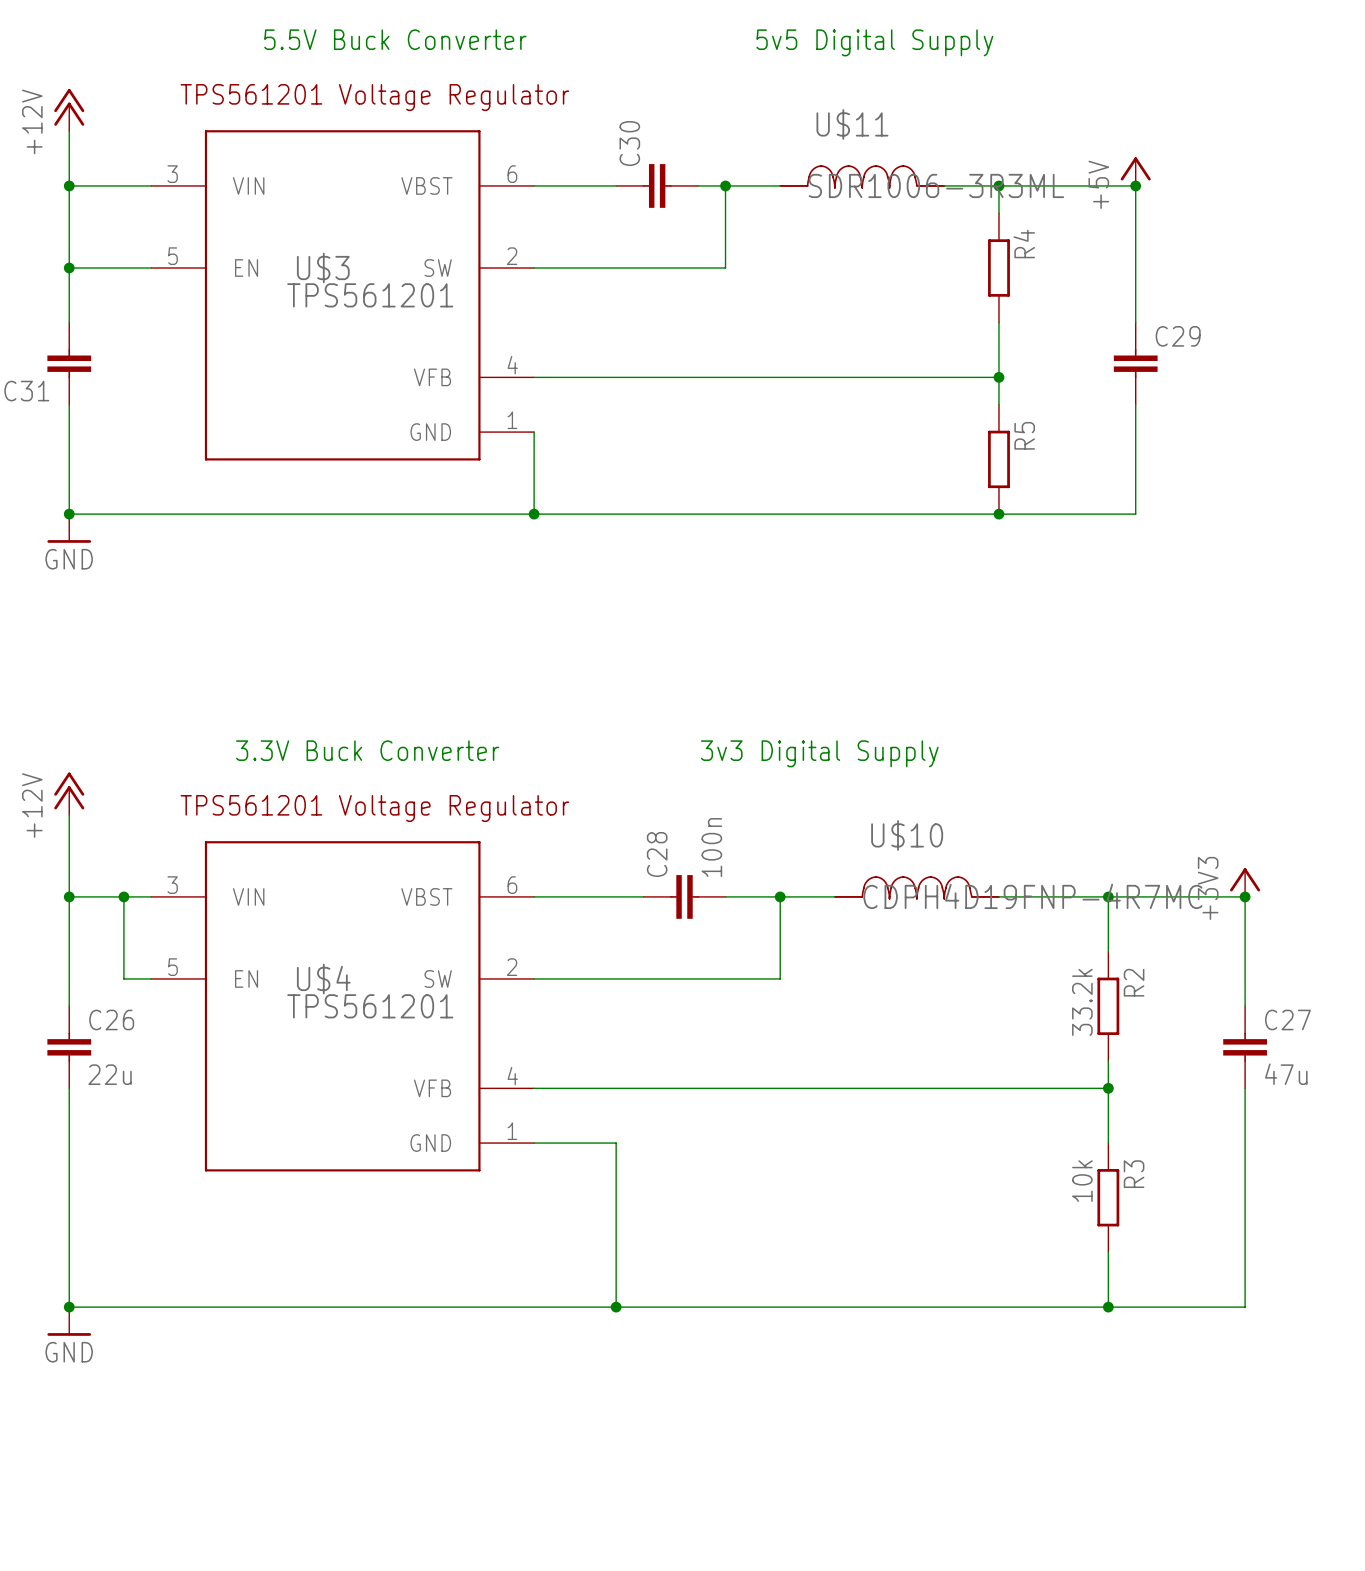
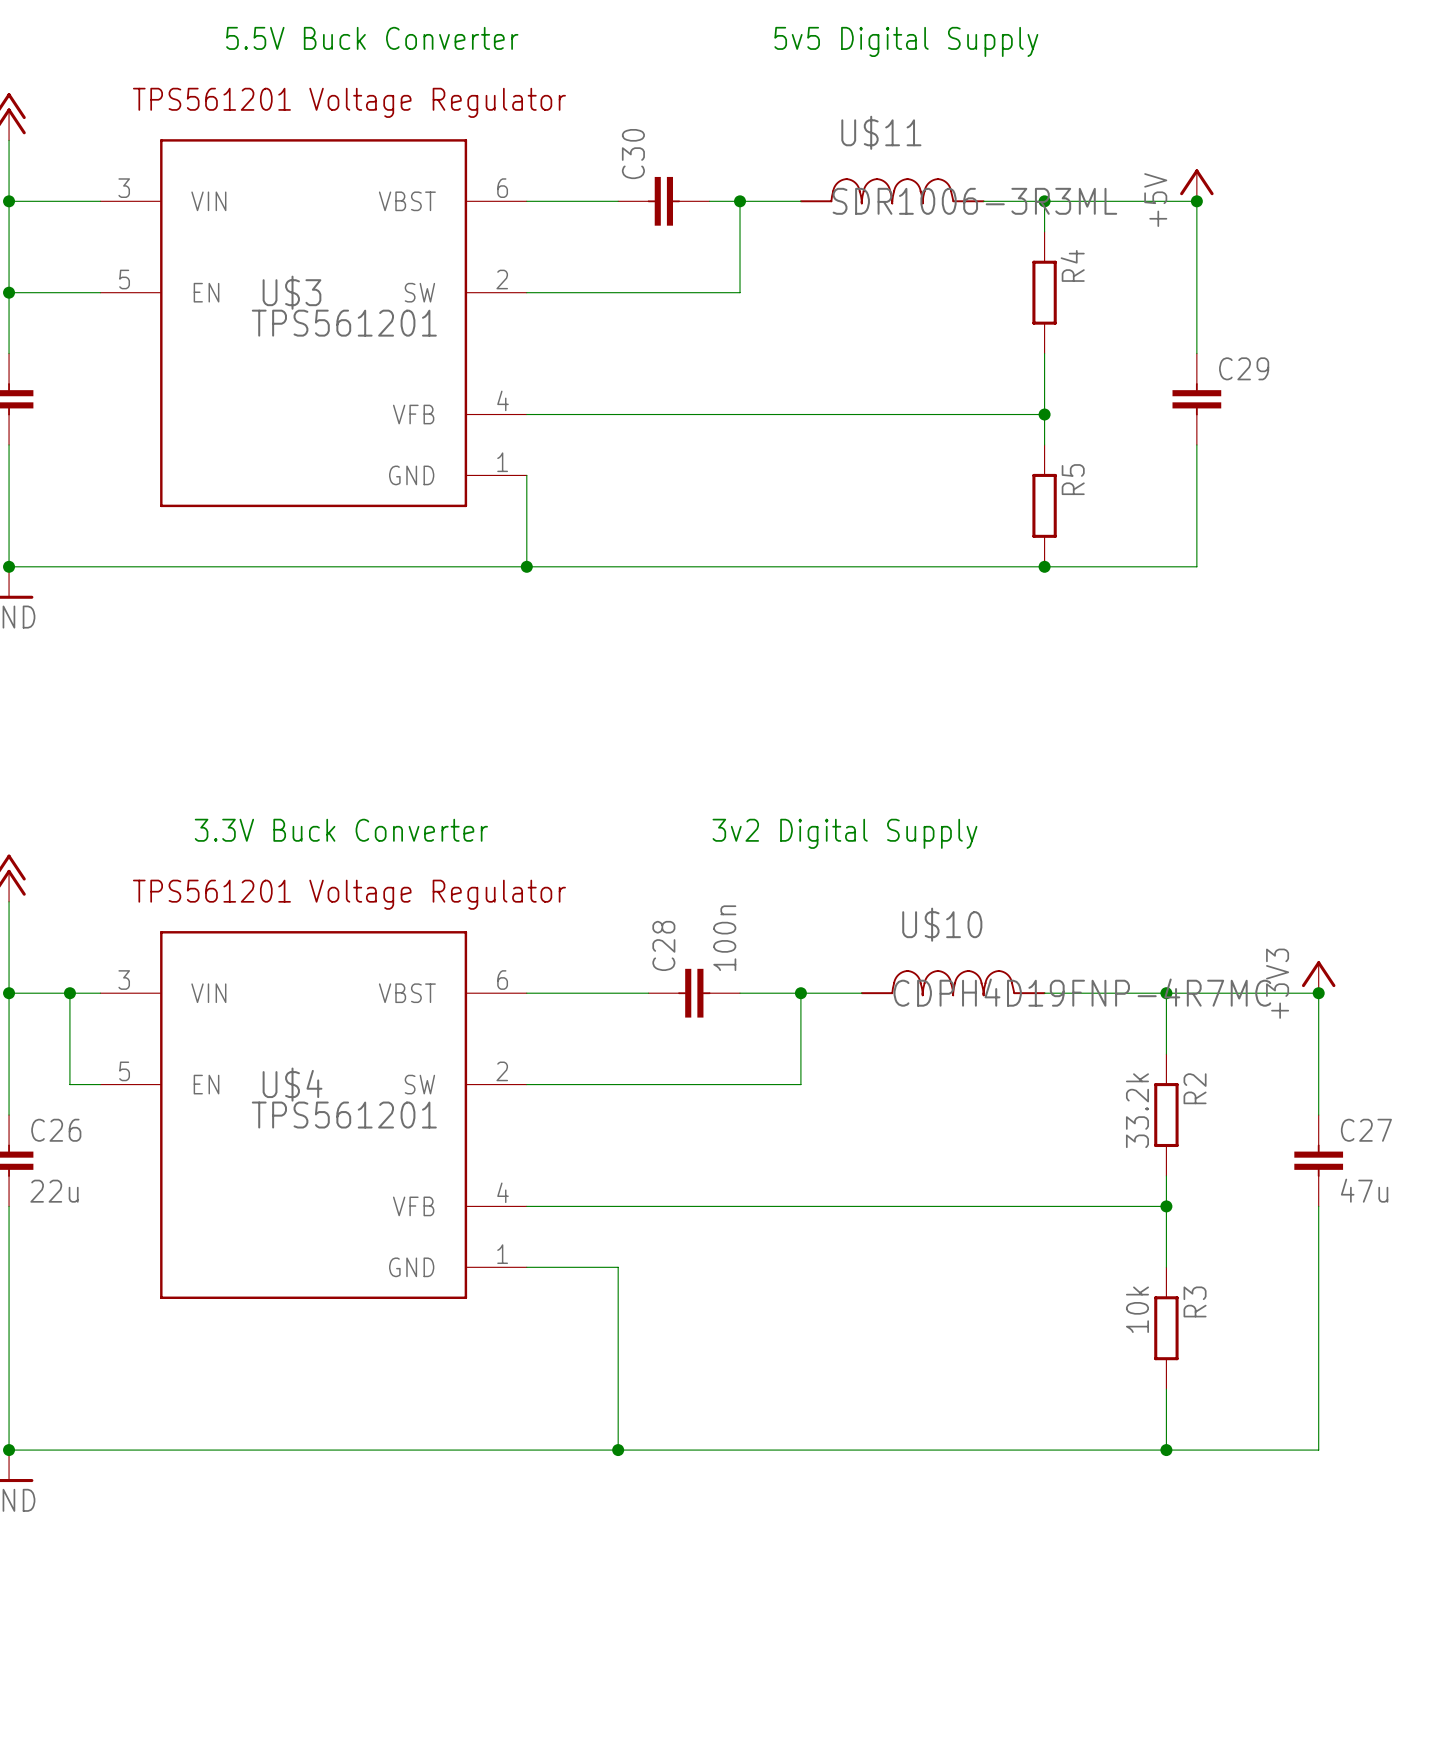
text: 3v3 Digital Supply (819, 753) -> 3v2 Digital Supply (844, 833)

